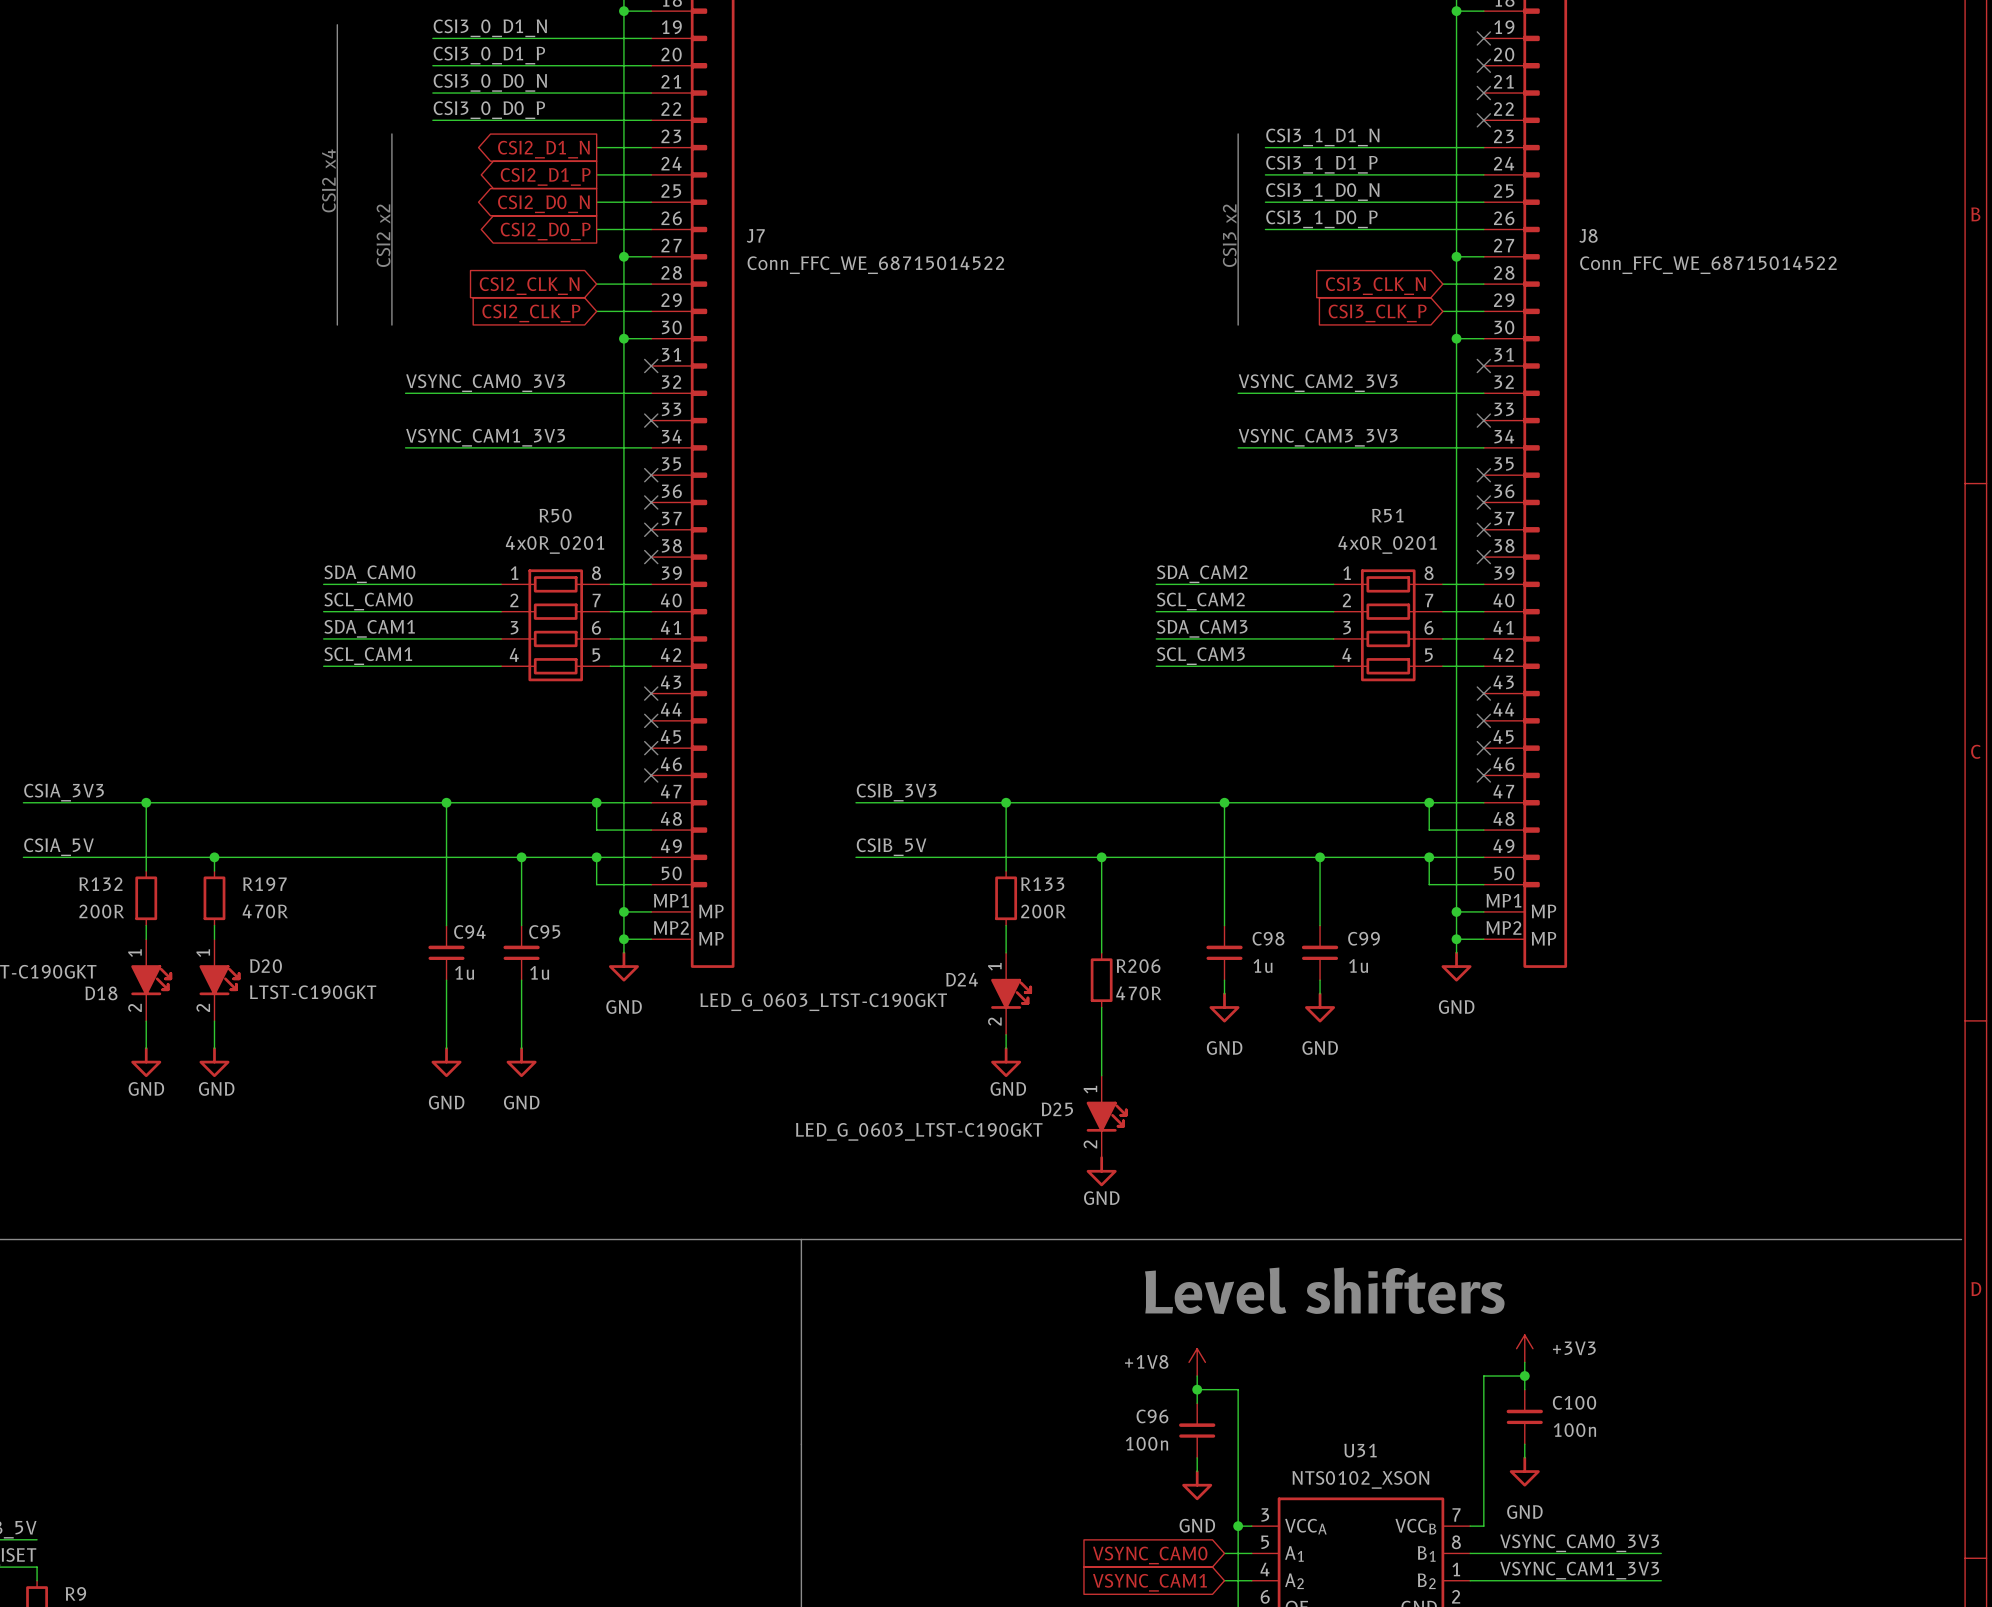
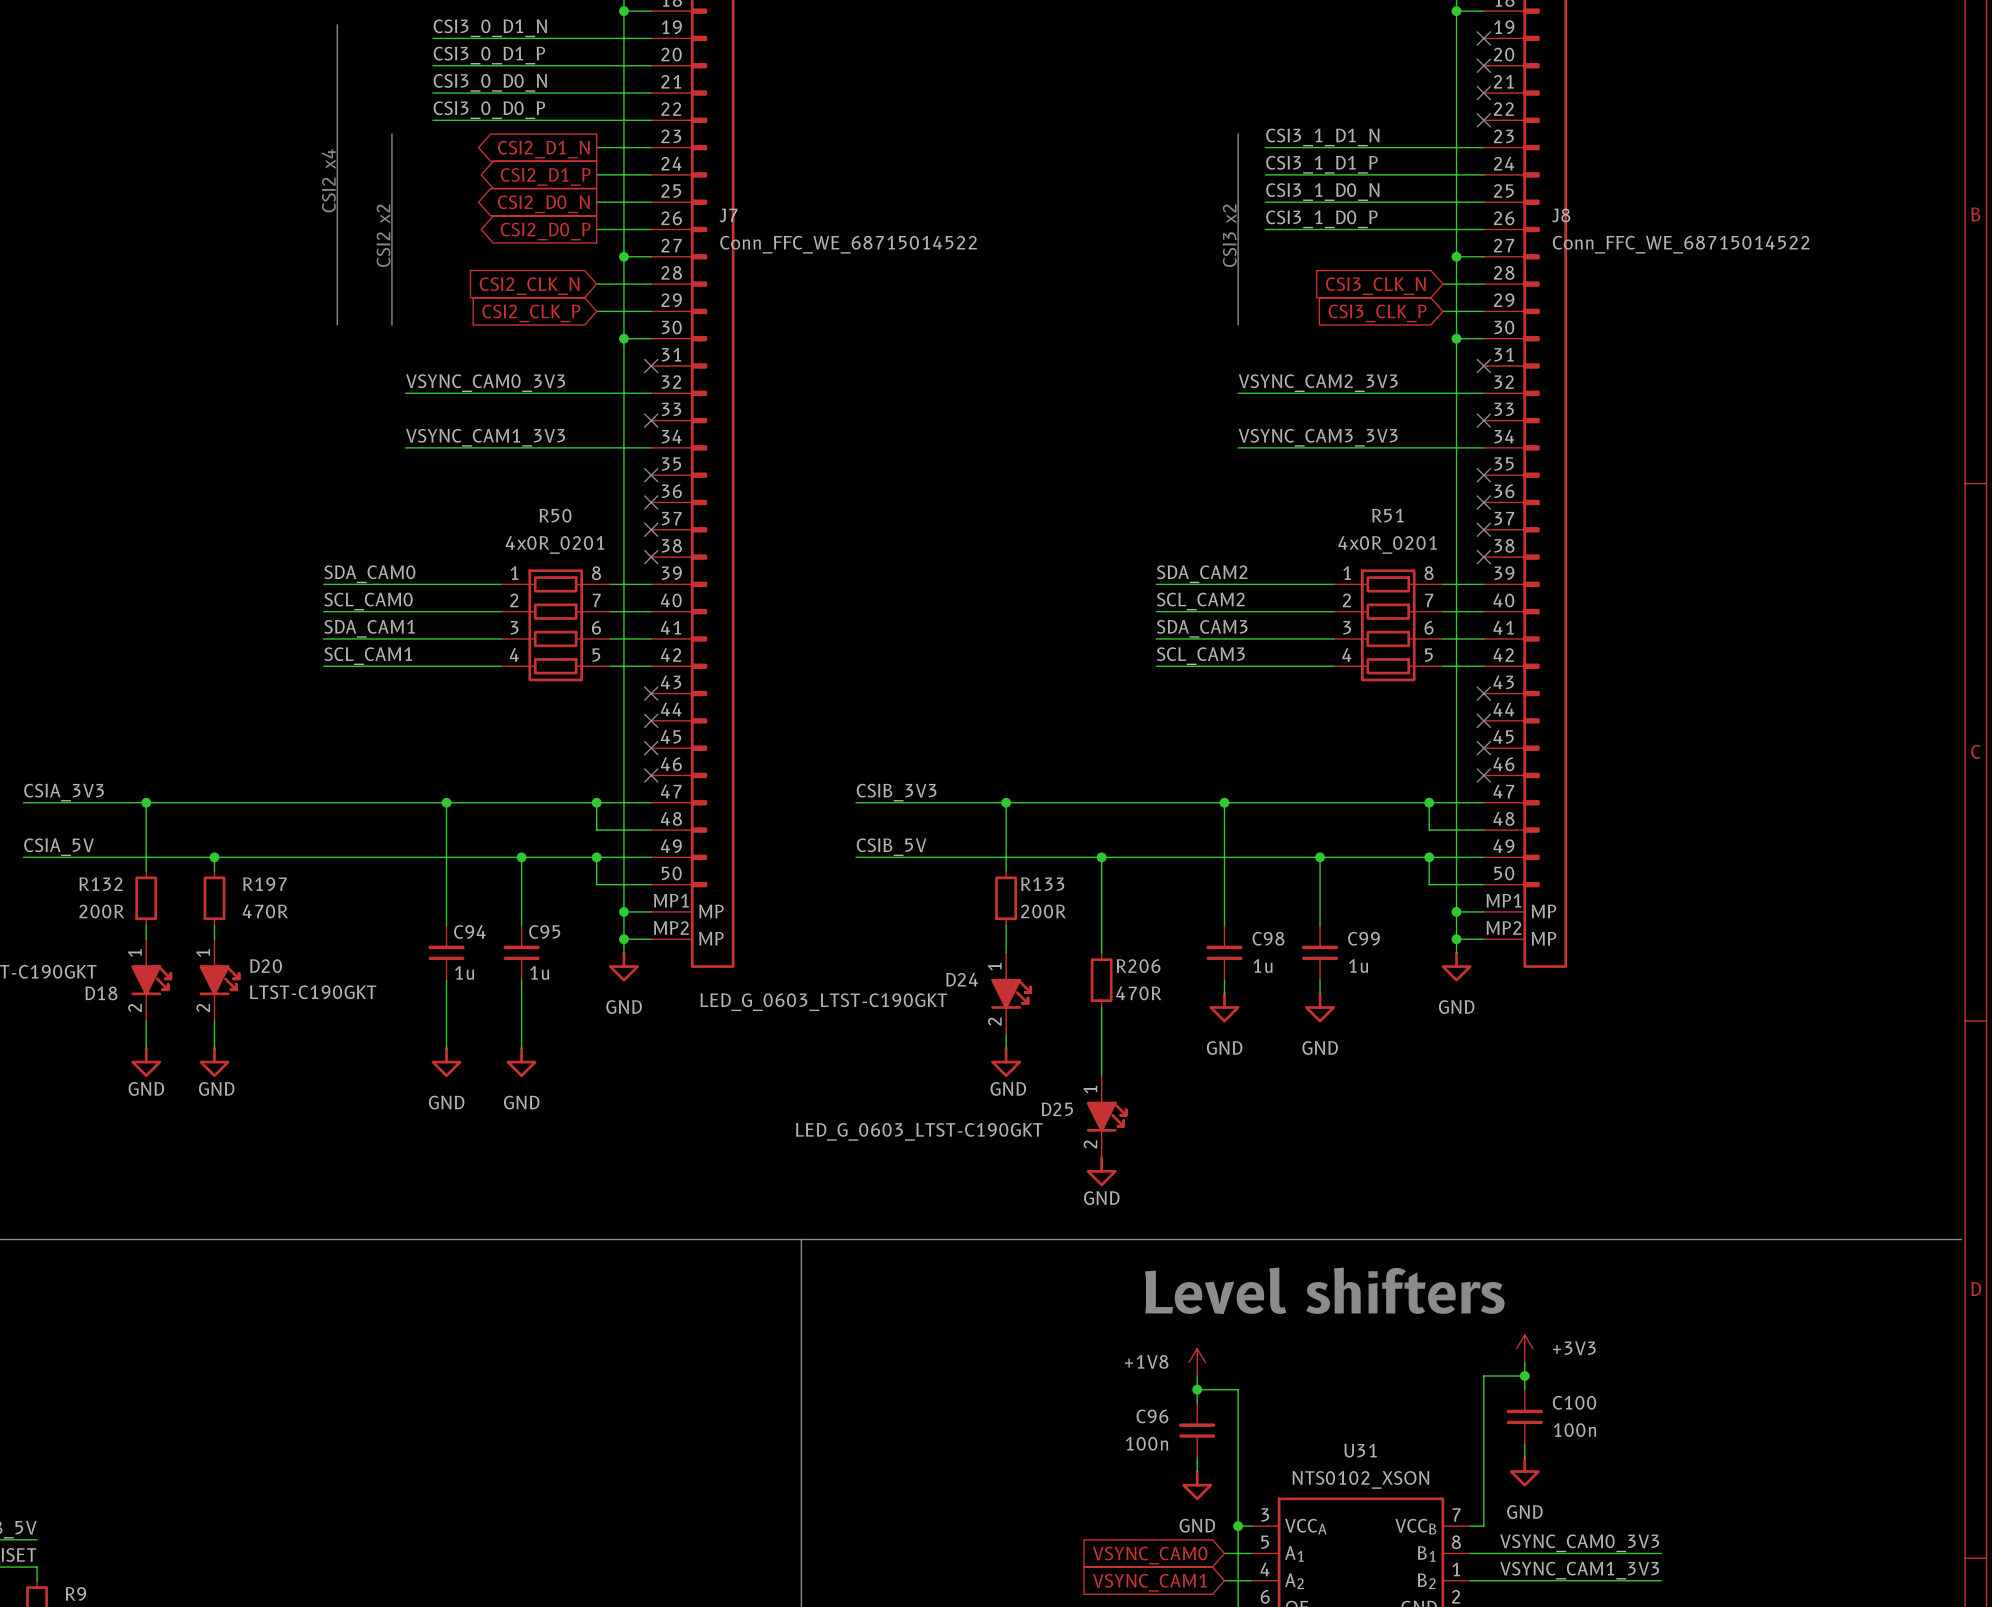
J7 name position: J7 (755, 235) -> J7 (728, 215)
J8 name position: J8 (1588, 235) -> J8 (1561, 215)
J7 value position: Conn_FFC_WE_68715014522 (875, 265) -> Conn_FFC_WE_68715014522 (848, 244)
J8 value position: Conn_FFC_WE_68715014522 (1708, 265) -> Conn_FFC_WE_68715014522 (1681, 244)

